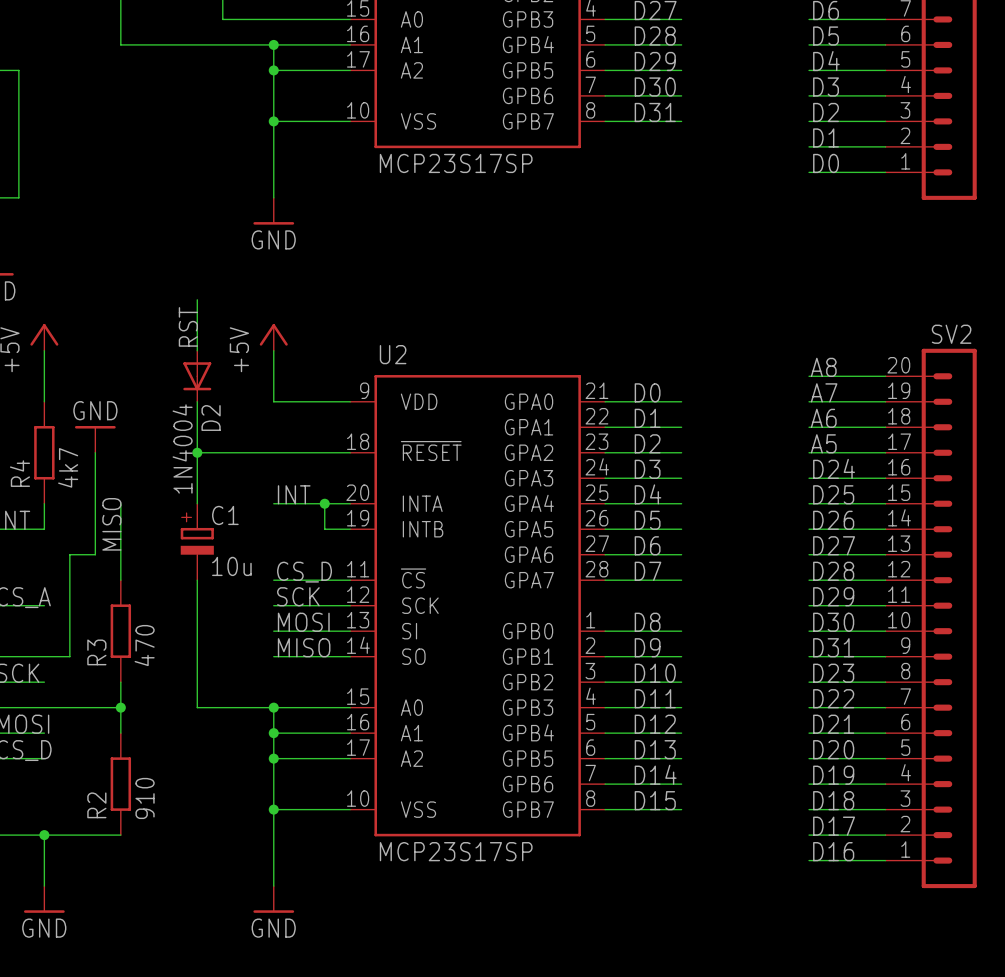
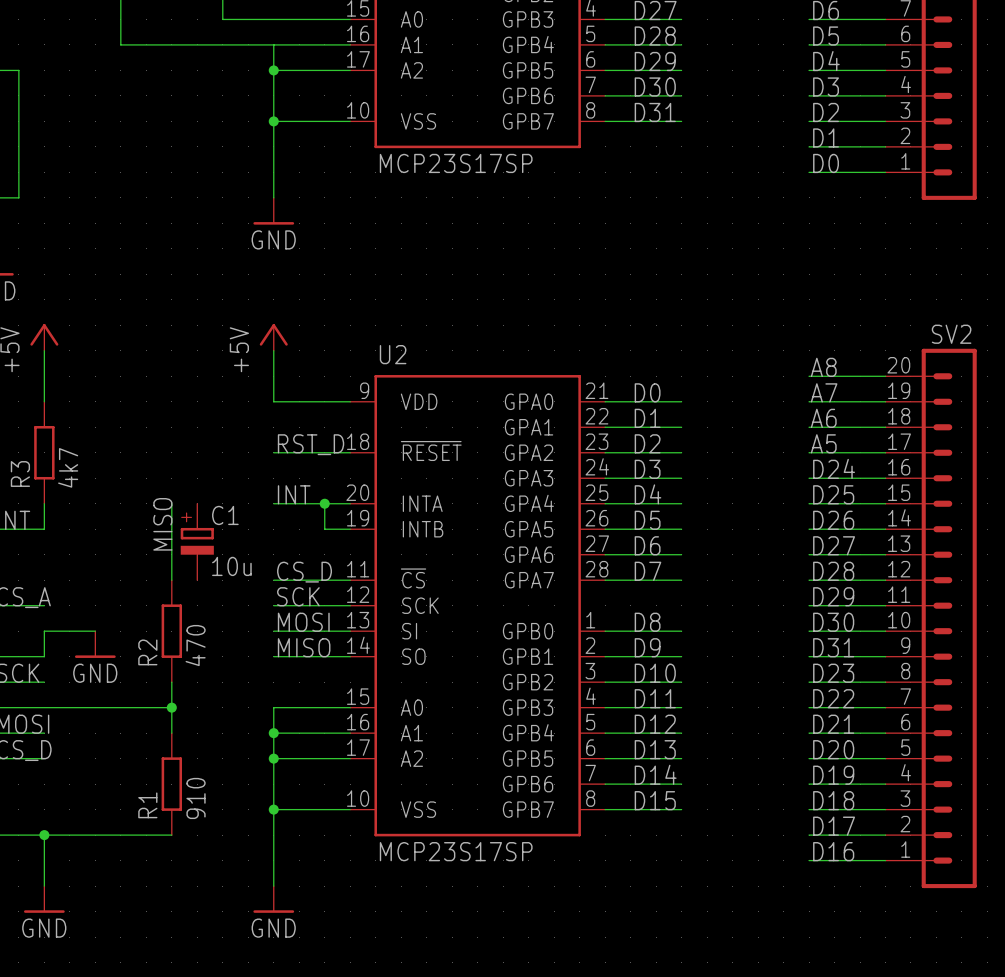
junction: (273, 44) -> none
wire: (197, 299) (197, 350) -> none
label: RST (188, 326) -> none
D2: 1N4004 (197, 376) -> none
wire: (197, 401) (197, 503) -> none
power symbol rotation: 0° (95, 427) -> 180° (95, 656)
power symbol position: GND (95, 439) -> GND (95, 644)
label: none -> RST_D (311, 444)
wire: (95, 452) (95, 554) (69, 554) (69, 656) (44, 656) -> (95, 631) (44, 631) (44, 656)
wire: (197, 452) (273, 452) -> none
junction: (197, 452) -> none
R4 name: R4 (19, 473) -> R3 (20, 473)
wire: (120, 503) (120, 580) -> (171, 503) (171, 580)
label position: MISO (111, 524) -> MISO (162, 524)
wire: (197, 580) (197, 707) (273, 707) -> none
R3: 470 (120, 631) -> none
wire: (120, 682) (120, 733) -> (171, 682) (171, 733)
wire: none -> (120, 707) (171, 707)
junction: (120, 707) -> none
junction: none -> (171, 707)
junction: (273, 707) -> none
R2 position: (120, 784) -> (171, 631)
R1: none -> 910 (171, 784)
R2 value: 910 (145, 798) -> 470 (195, 645)
wire: none -> (120, 835) (171, 835)

